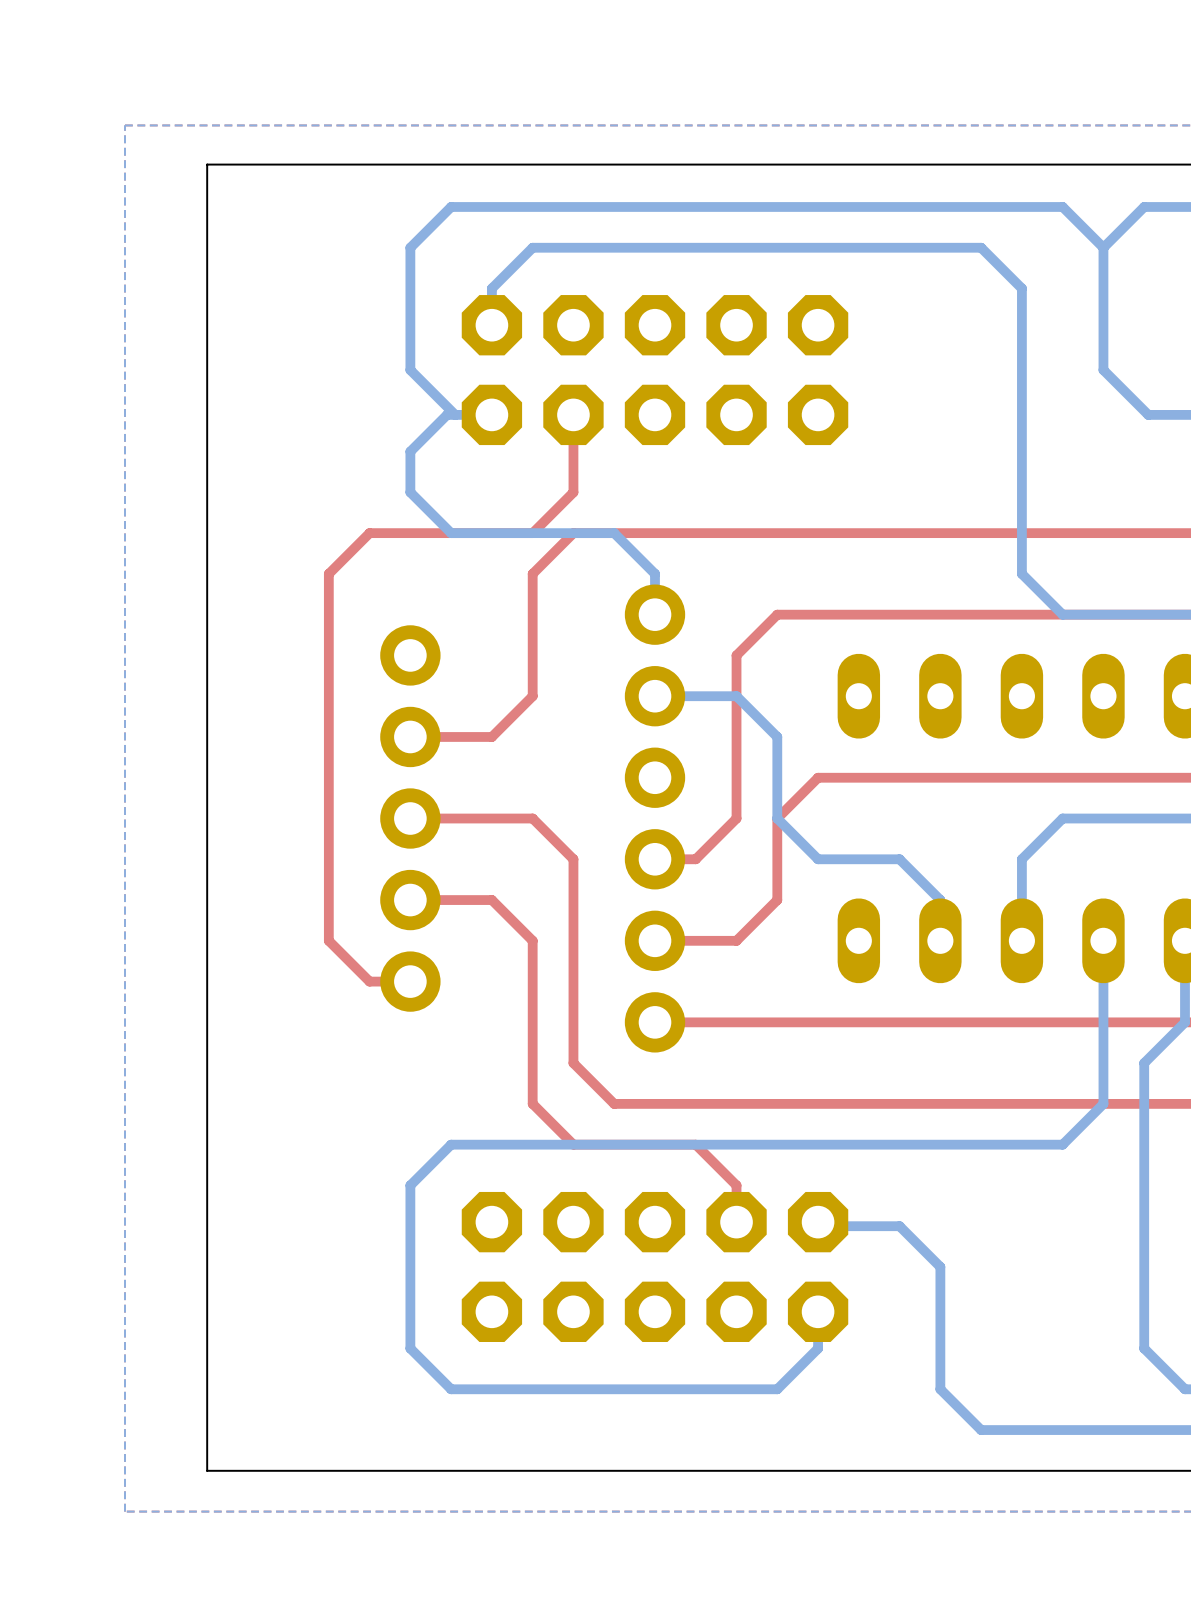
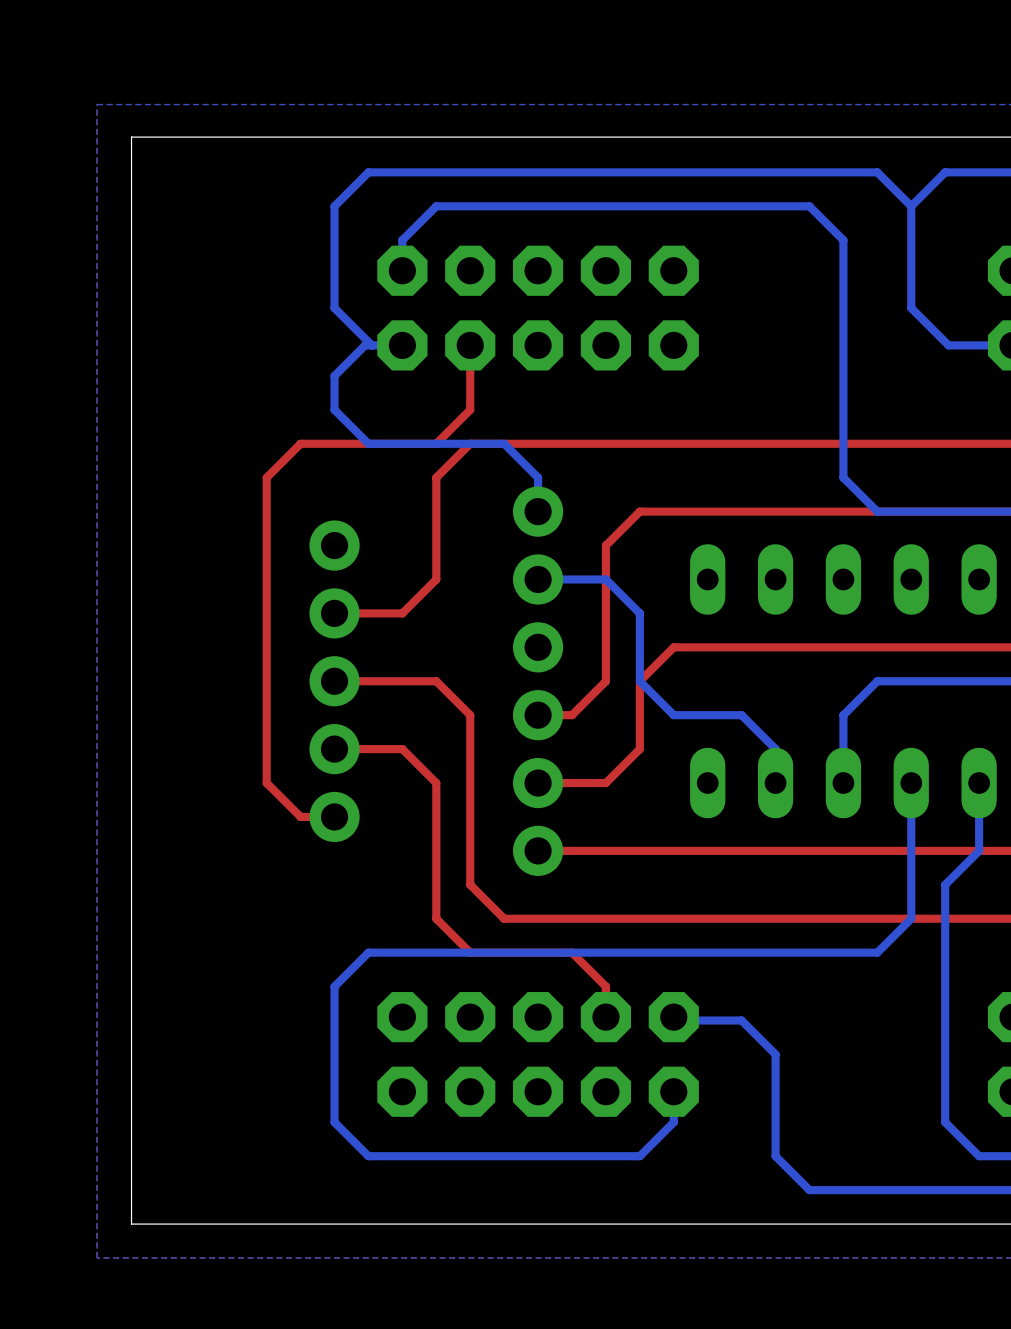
board edge: (207, 164) (207, 1470) -> (165, 137) (131, 137) (131, 1224) (165, 1224)

